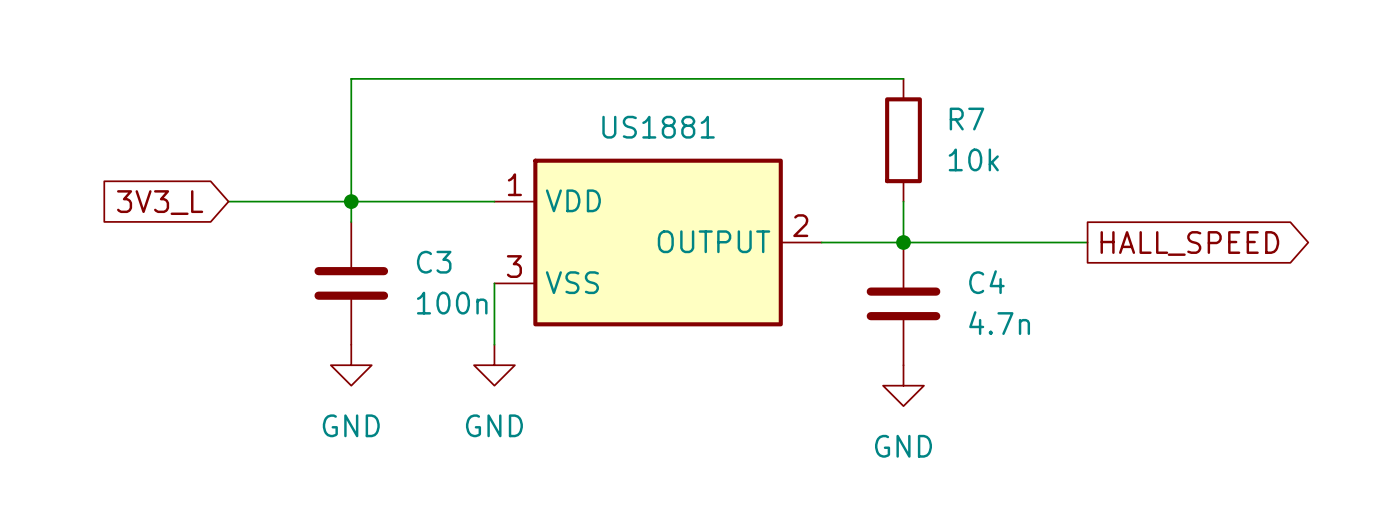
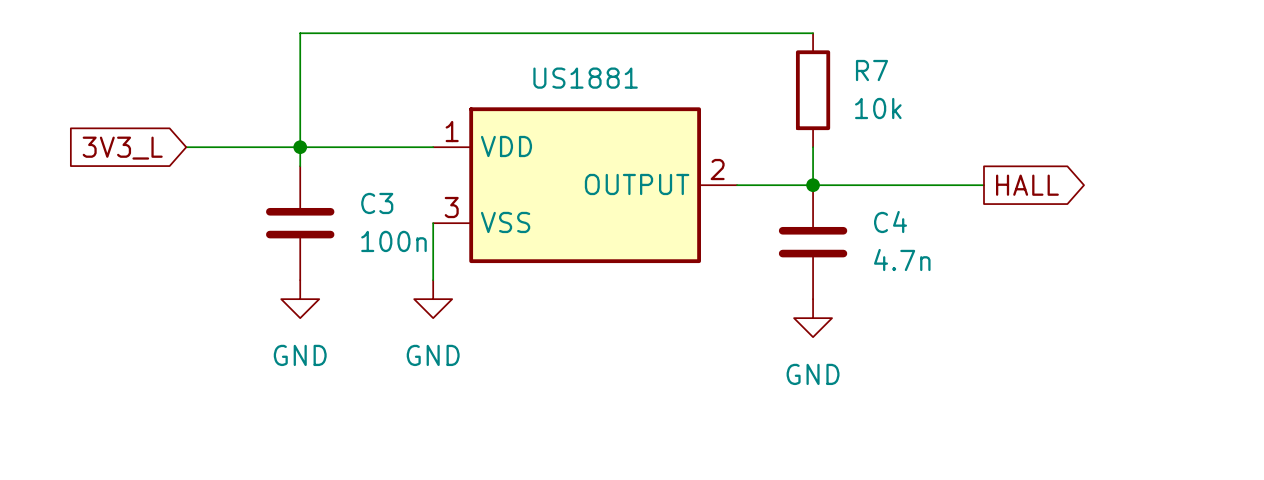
global label: HALL_SPEED (1189, 243) -> HALL (1027, 185)

